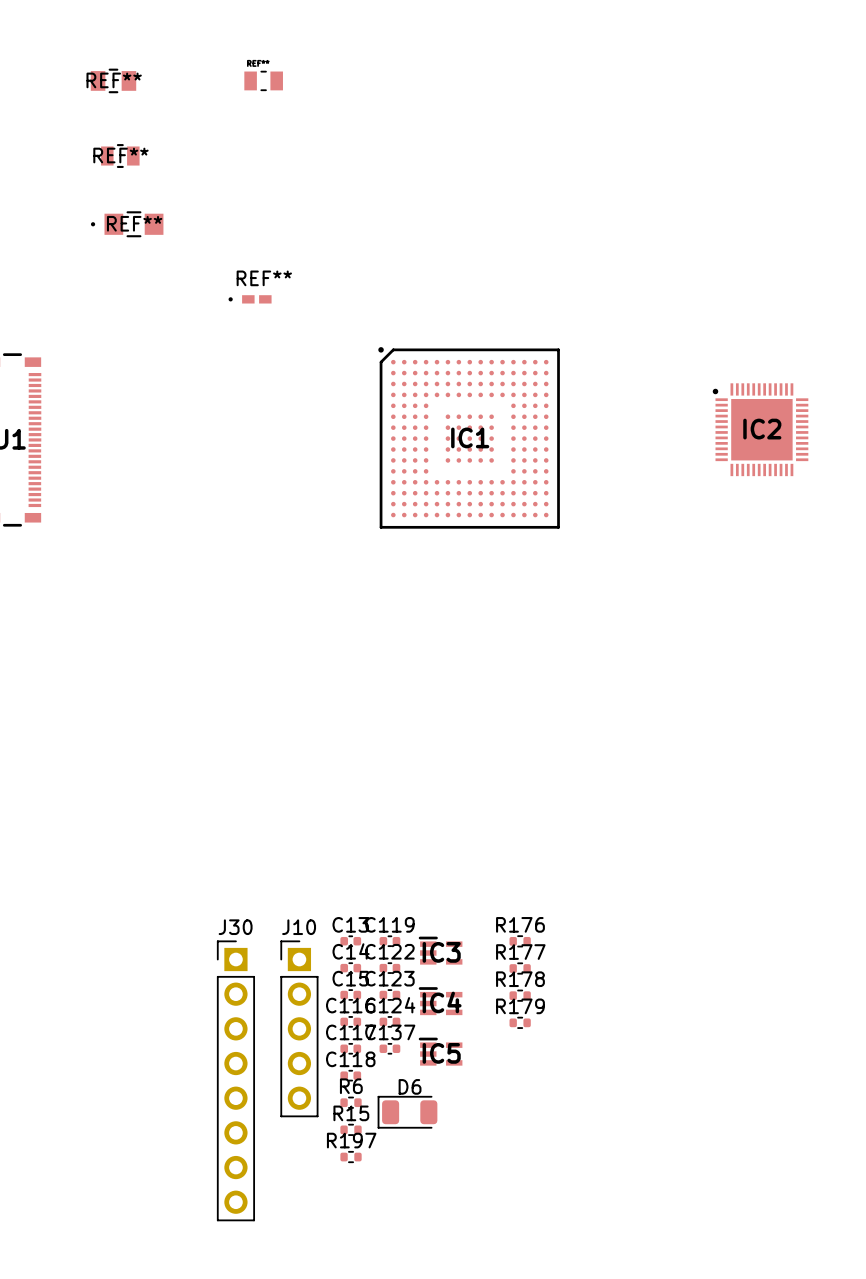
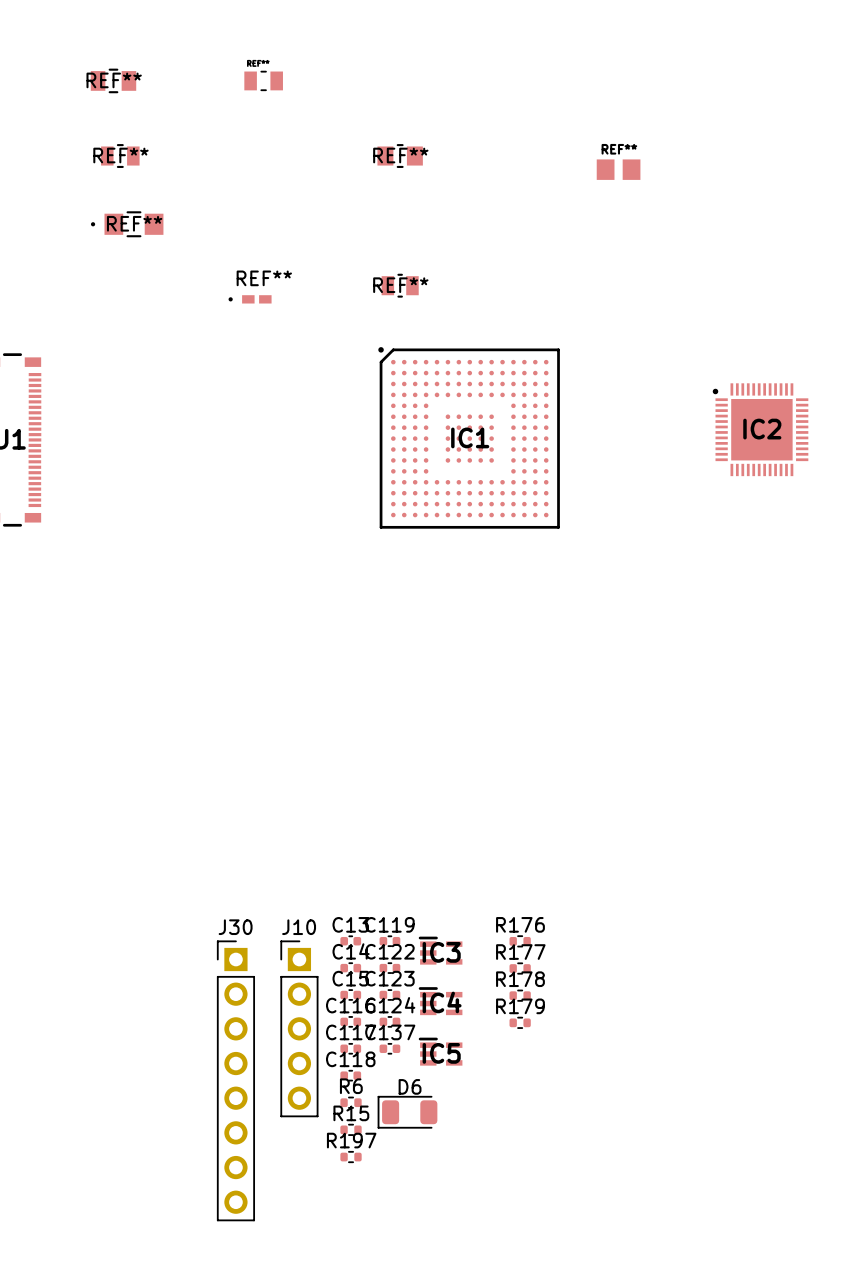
REF**: none -> (400, 156)
REF**: none -> (618, 169)
REF**: none -> (400, 285)

